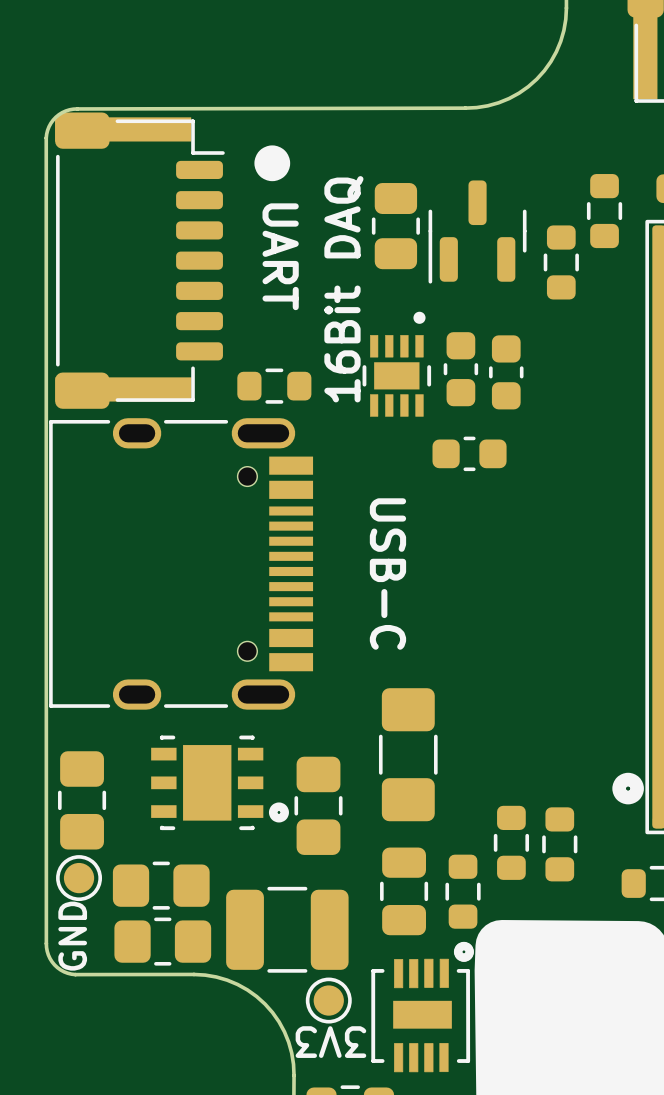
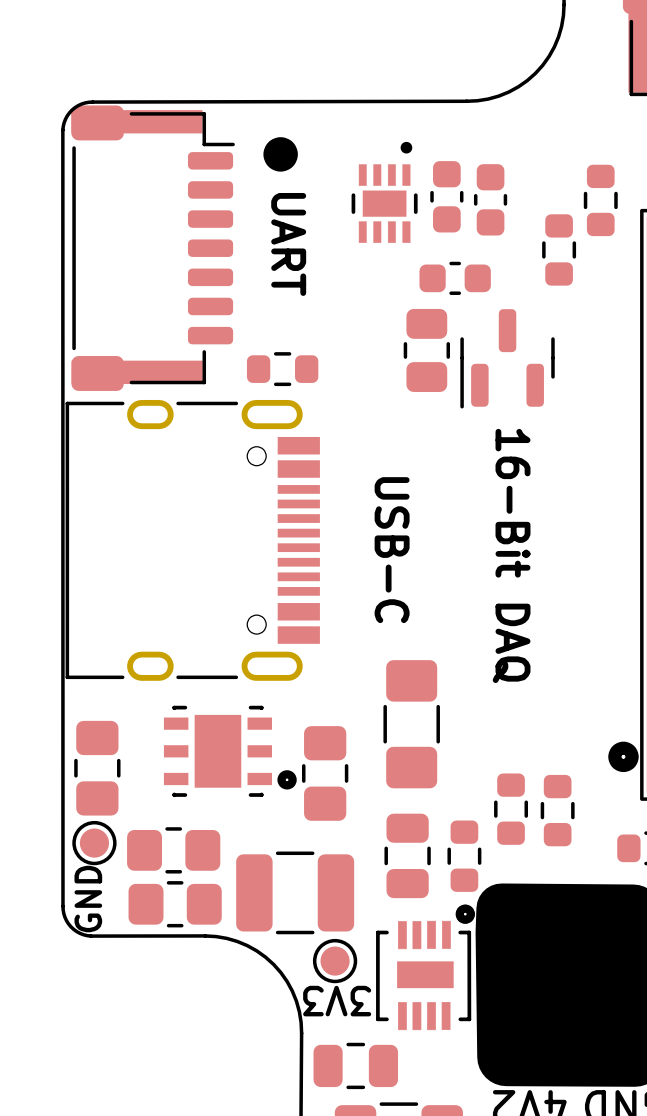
part: none -> (446, 196)
part: none -> (490, 199)
part position: (395, 226) -> (426, 350)
part: (477, 232) -> none
text: 16Bit DAQ (343, 289) -> none
part footprint: [489, 335, 524, 410] -> [460, 309, 555, 409]
part position: (396, 364) -> (384, 192)
part rotation: 0° (460, 369) -> 90° clockwise (455, 278)
part position: (460, 369) -> (455, 278)
part: (469, 453) -> none
text: none -> 16-Bit DAQ (511, 555)

